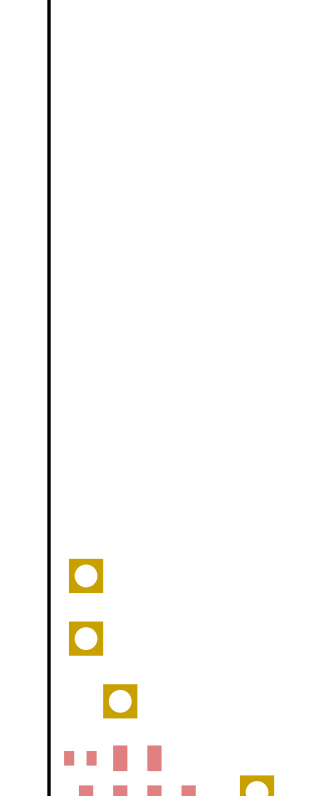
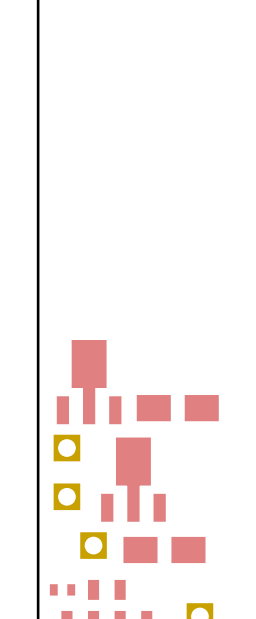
part: none -> (89, 382)
part: none -> (177, 408)
part: none -> (133, 479)
part: none -> (164, 549)

